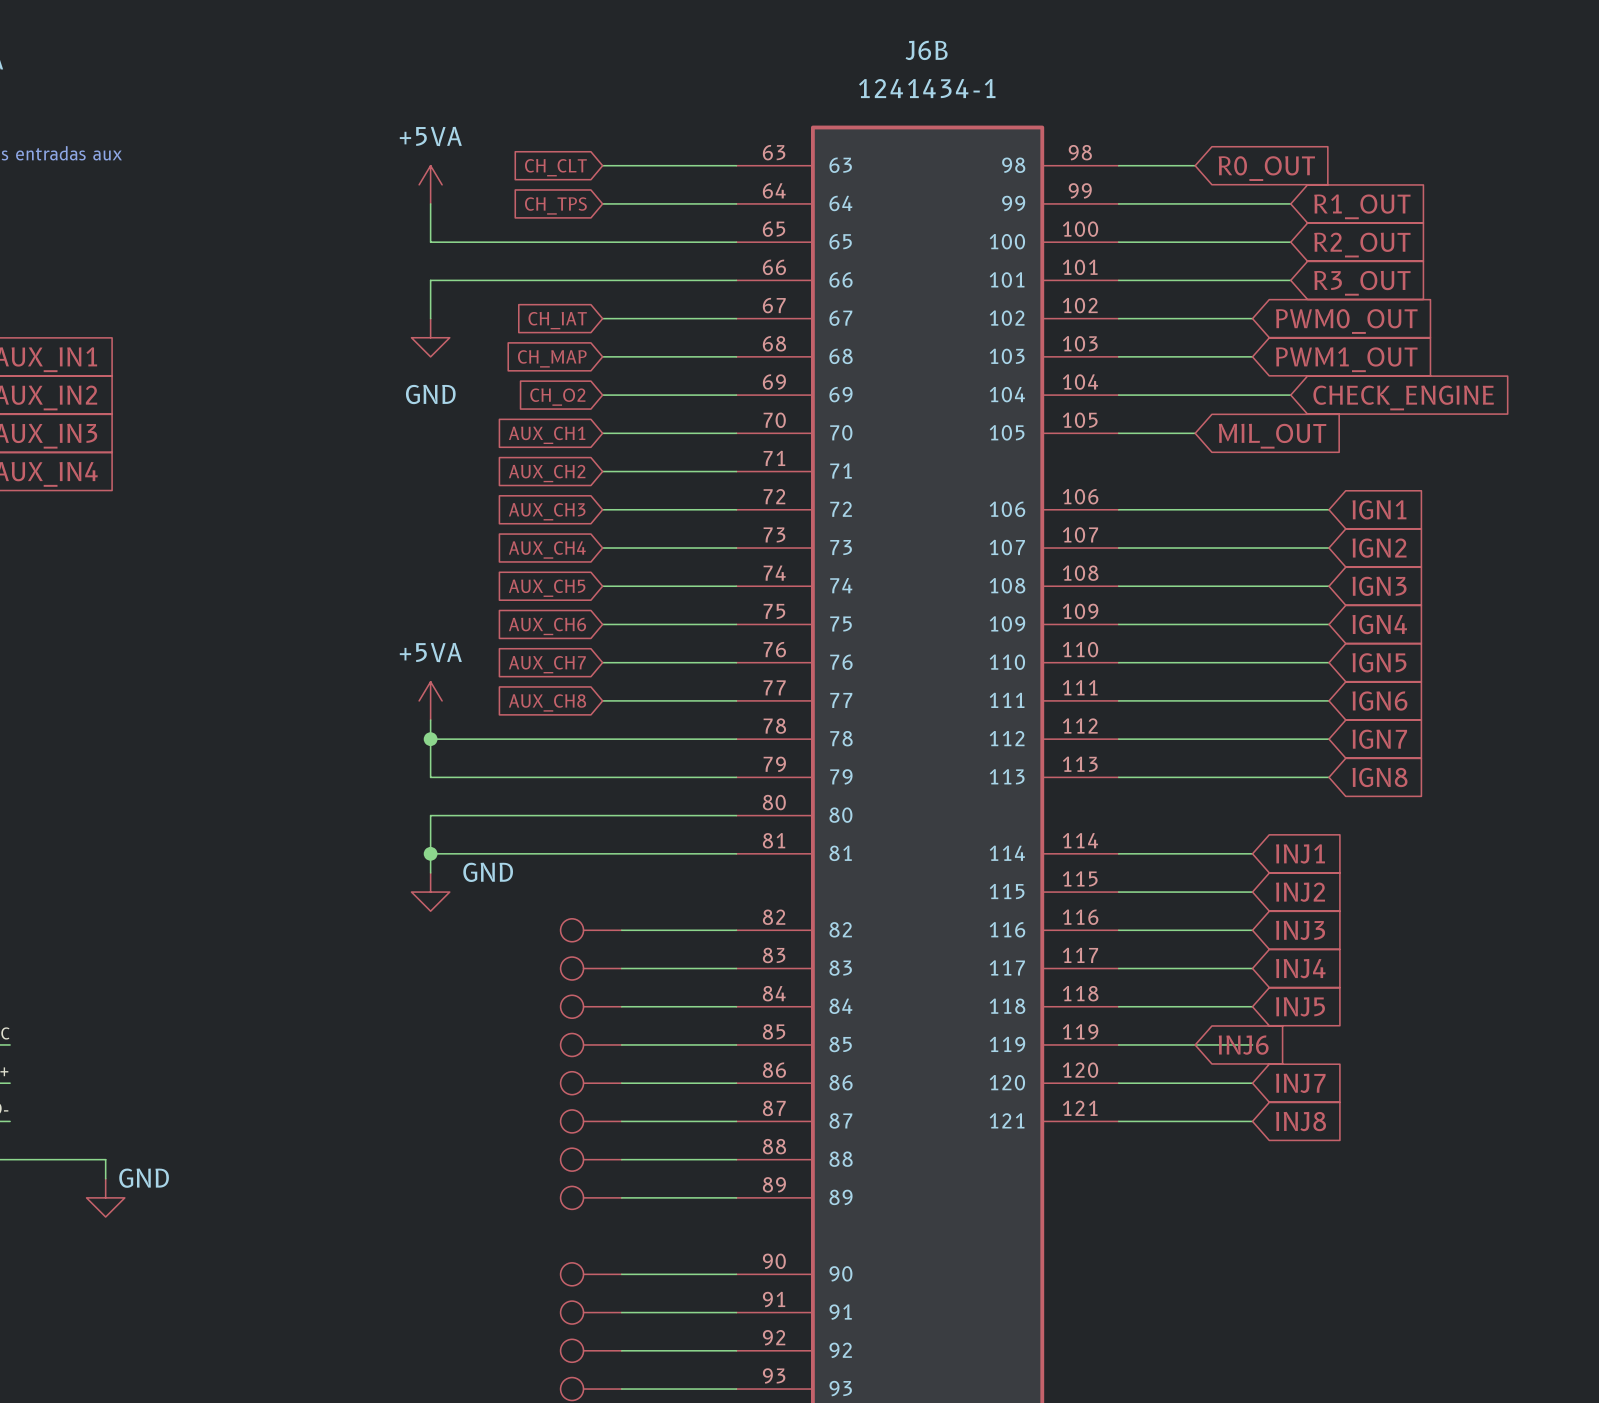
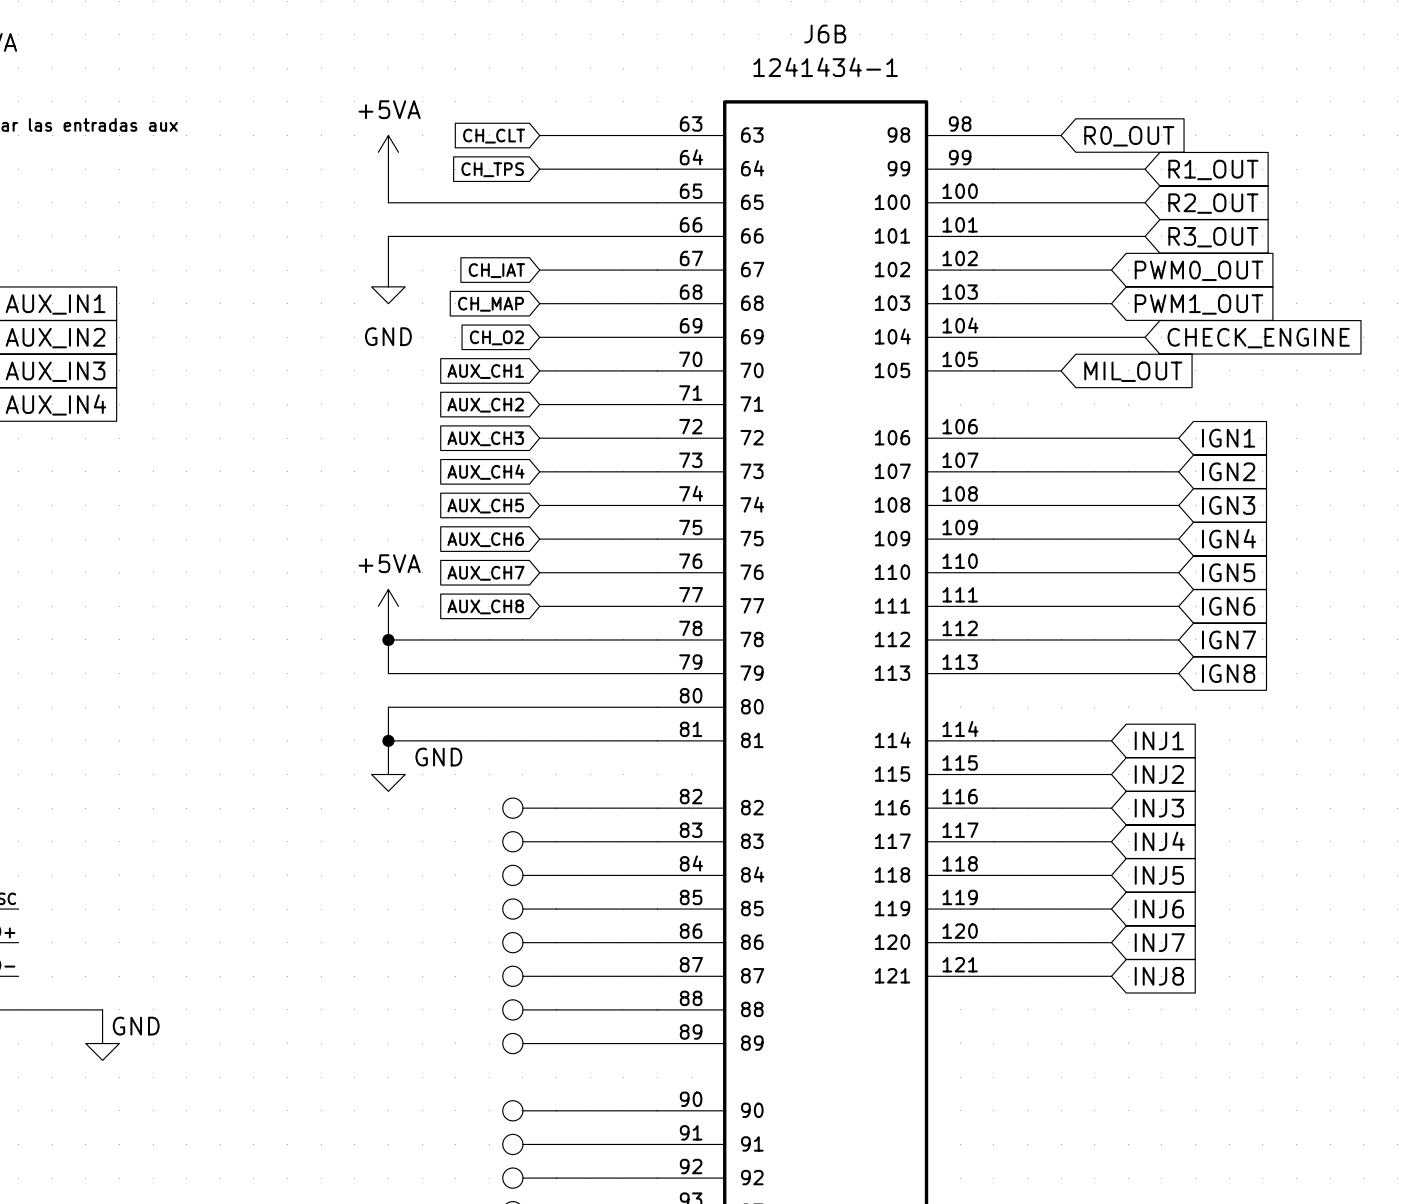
global label position: INJ6 (1243, 1045) -> INJ6 (1159, 909)

